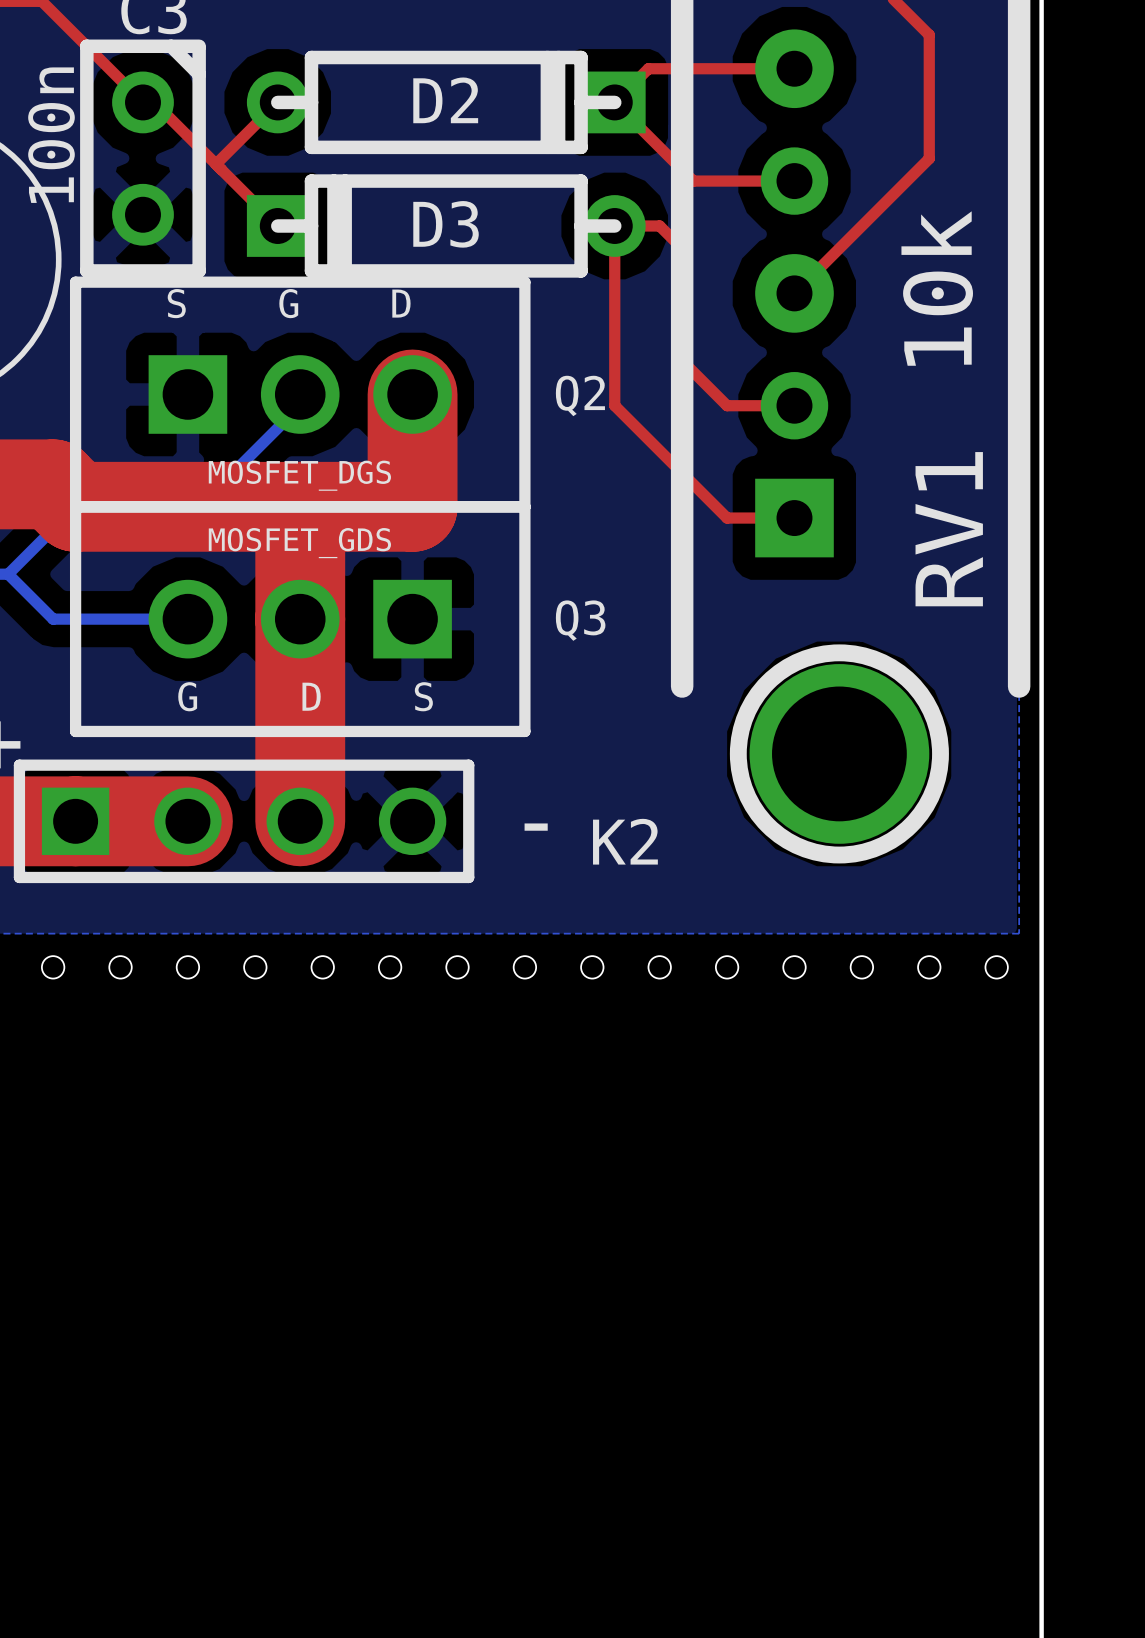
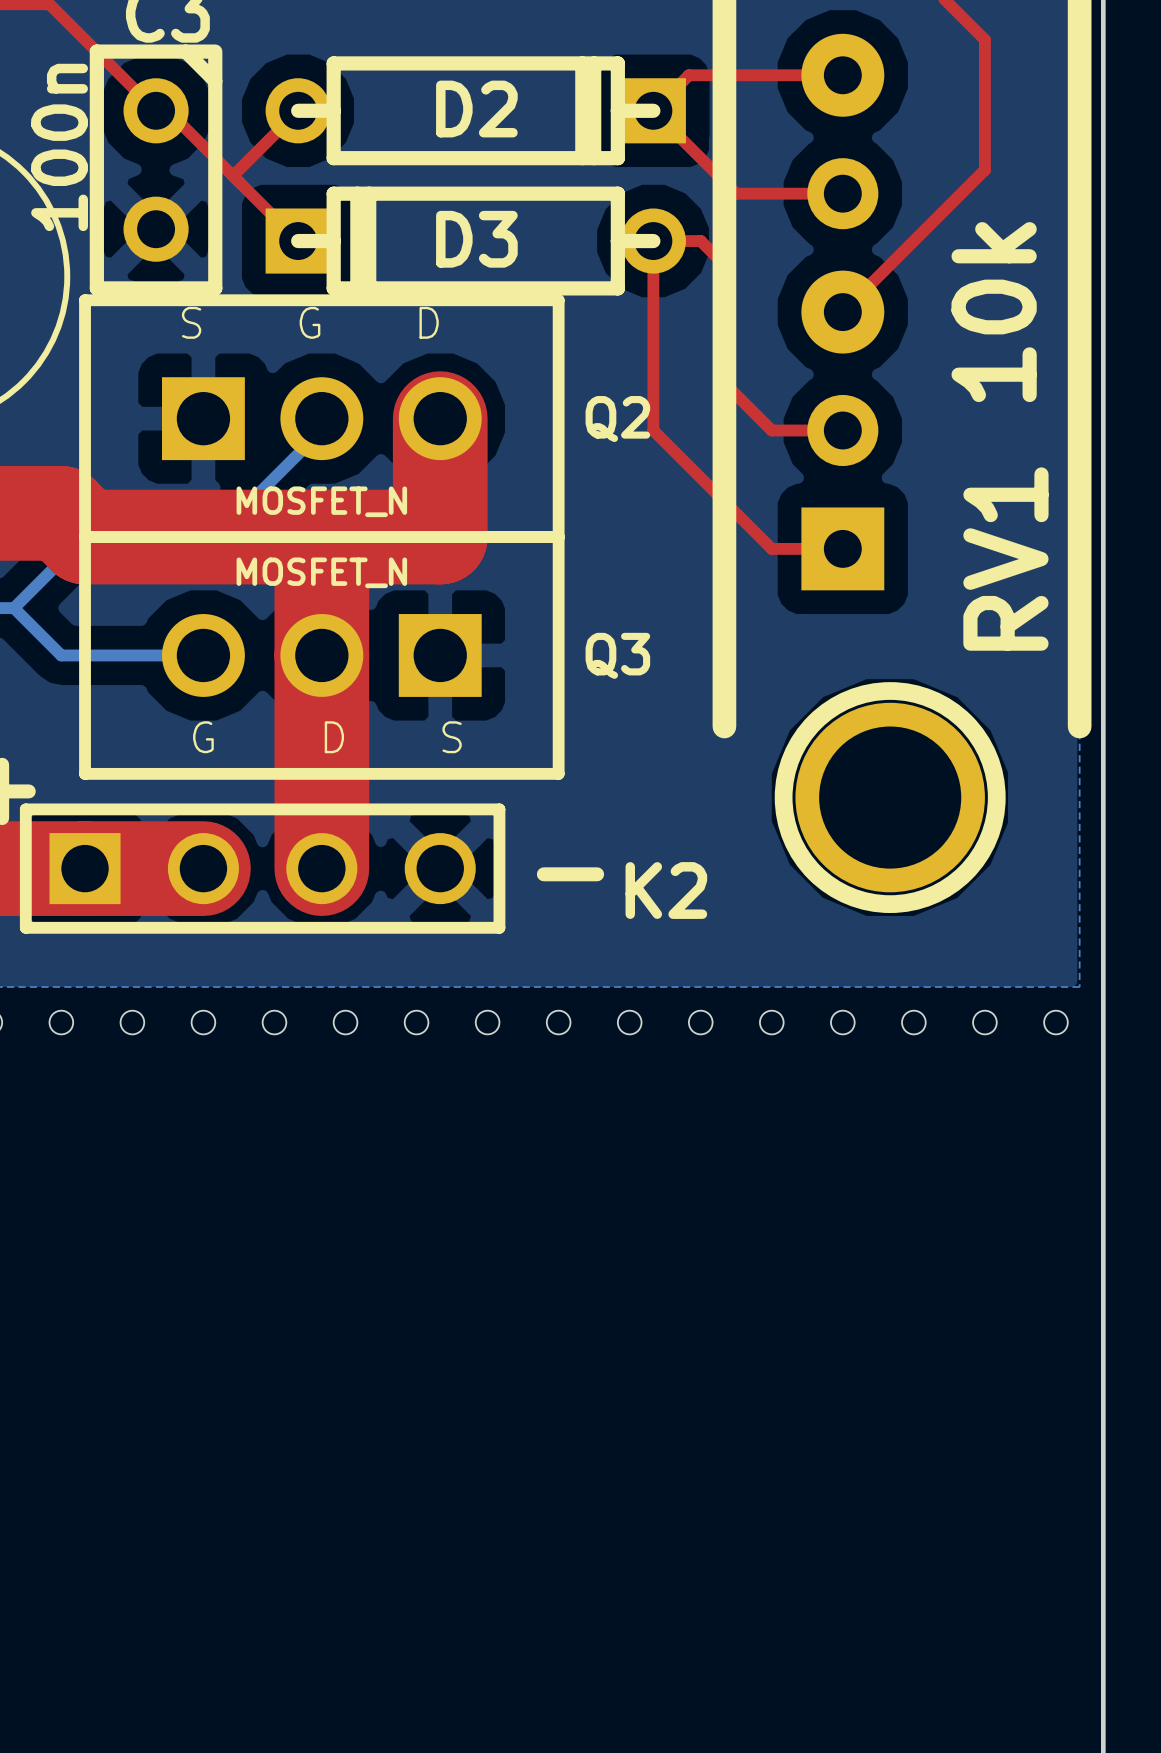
Q2 value: MOSFET_DGS (299, 475) -> MOSFET_N (321, 501)
Q3 value: MOSFET_GDS (299, 543) -> MOSFET_N (321, 572)

